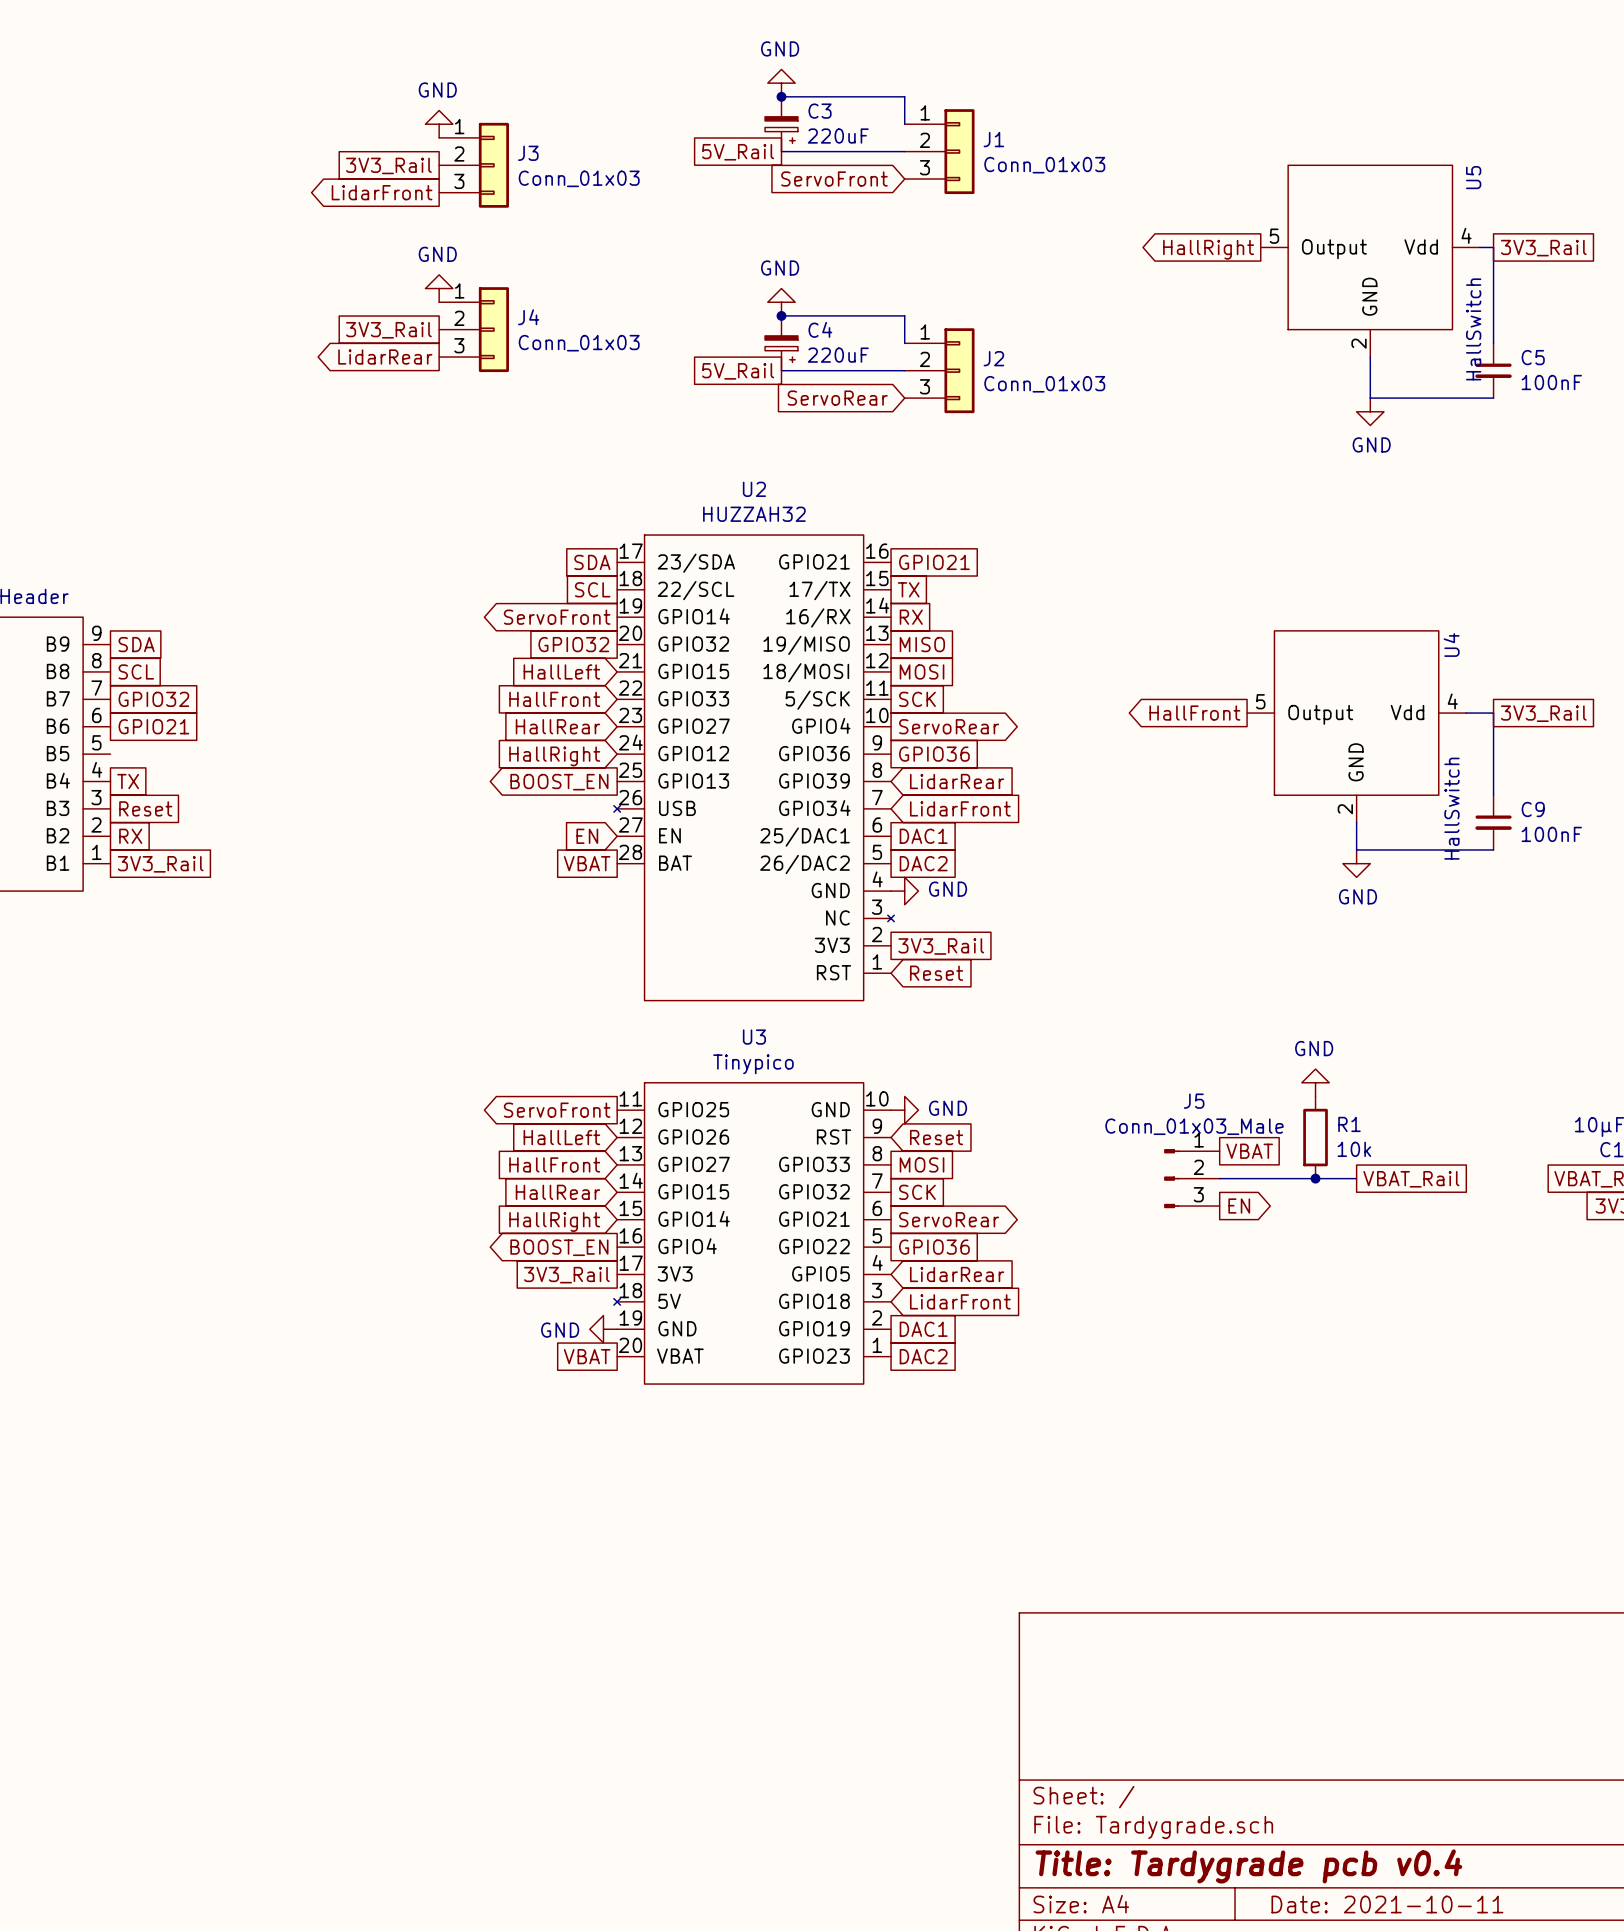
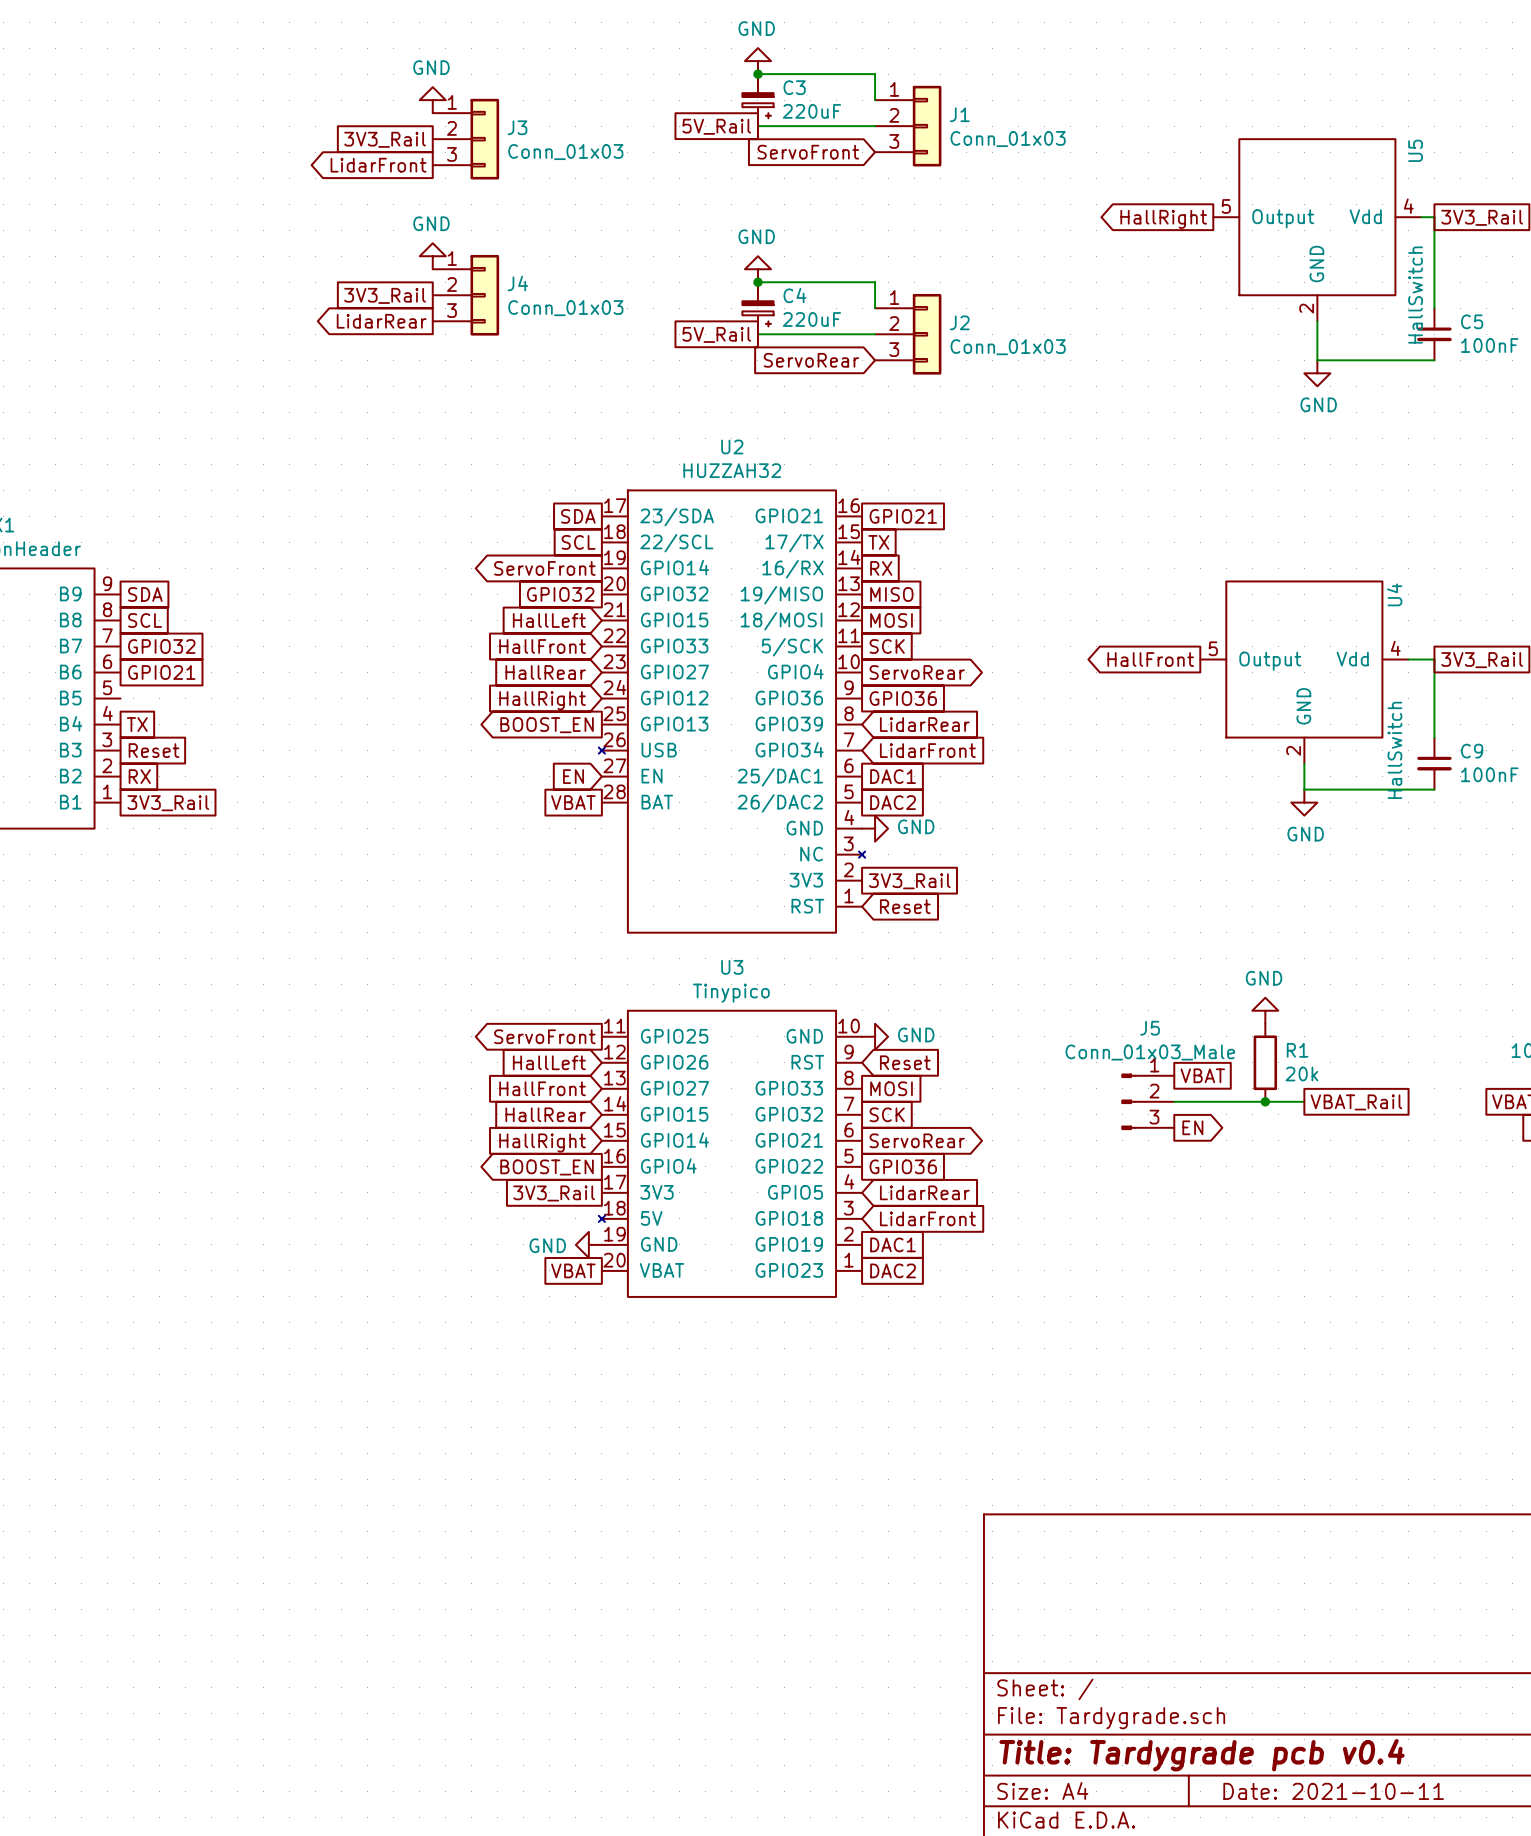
R1 value: 10k (1354, 1149) -> 20k (1301, 1074)

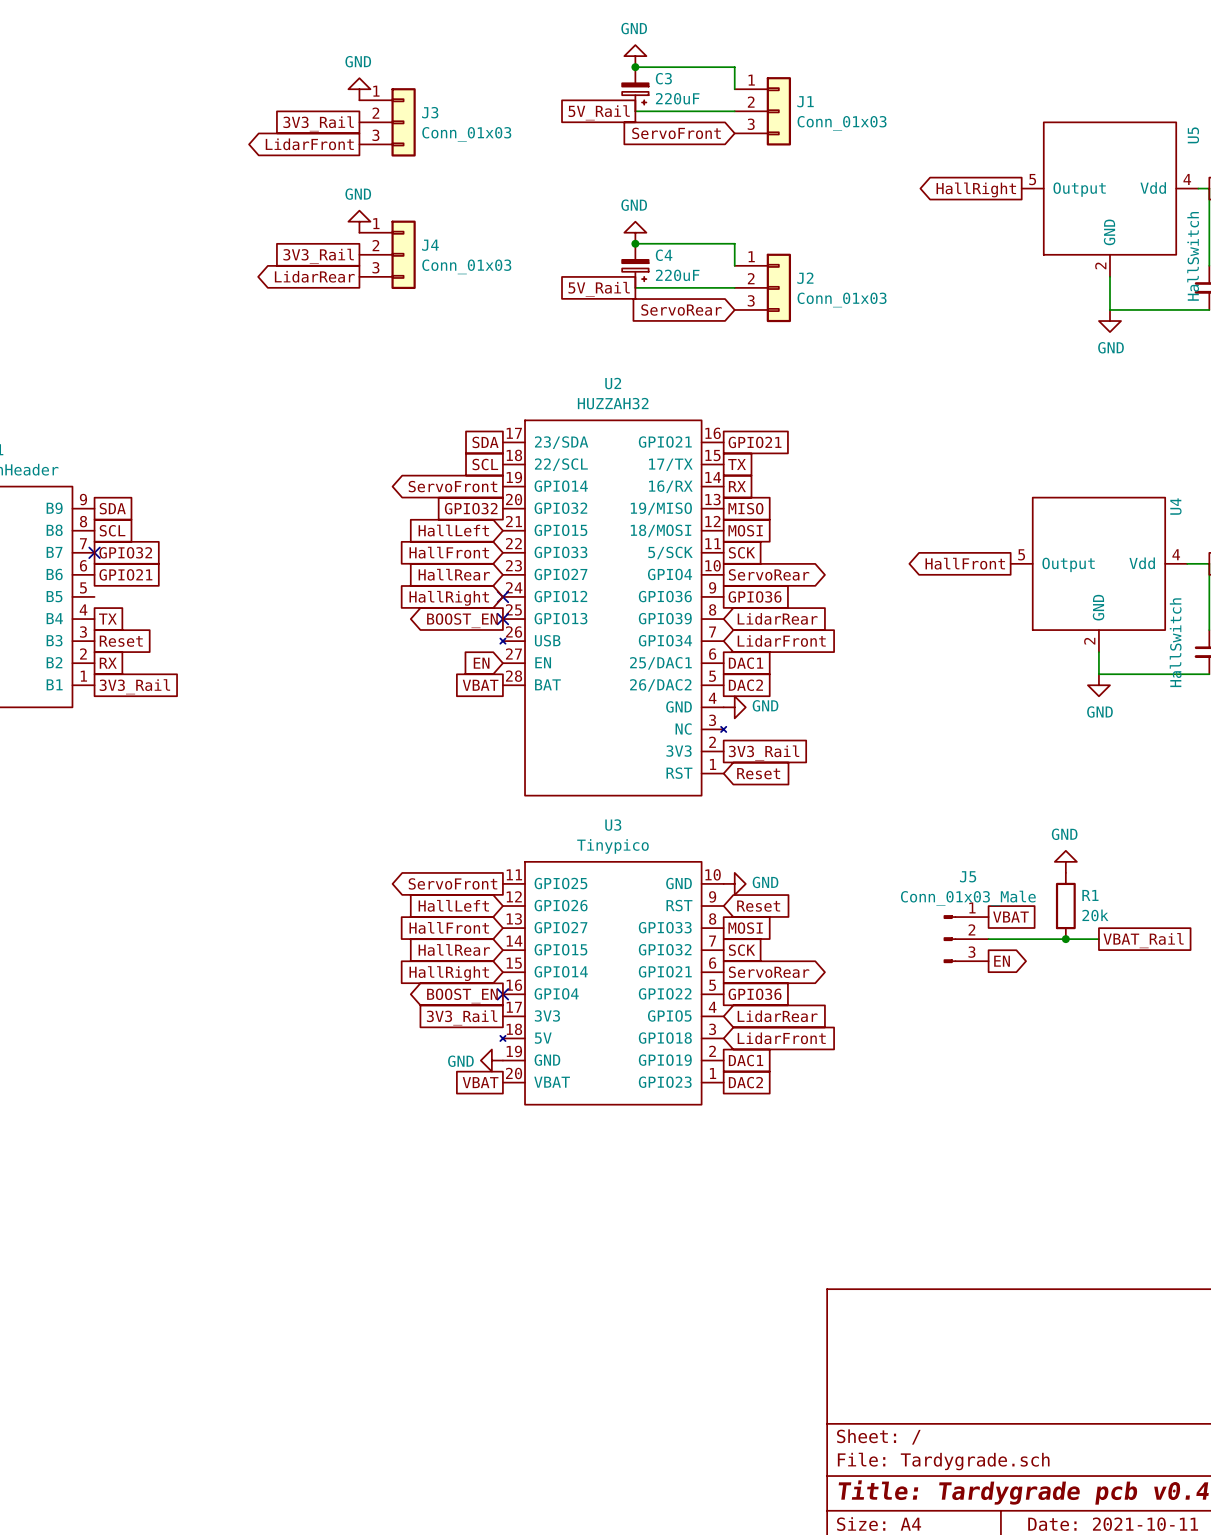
no-connect mark: none -> (94, 552)
no-connect mark: none -> (502, 596)
no-connect mark: none -> (502, 619)
no-connect mark: none -> (502, 994)

